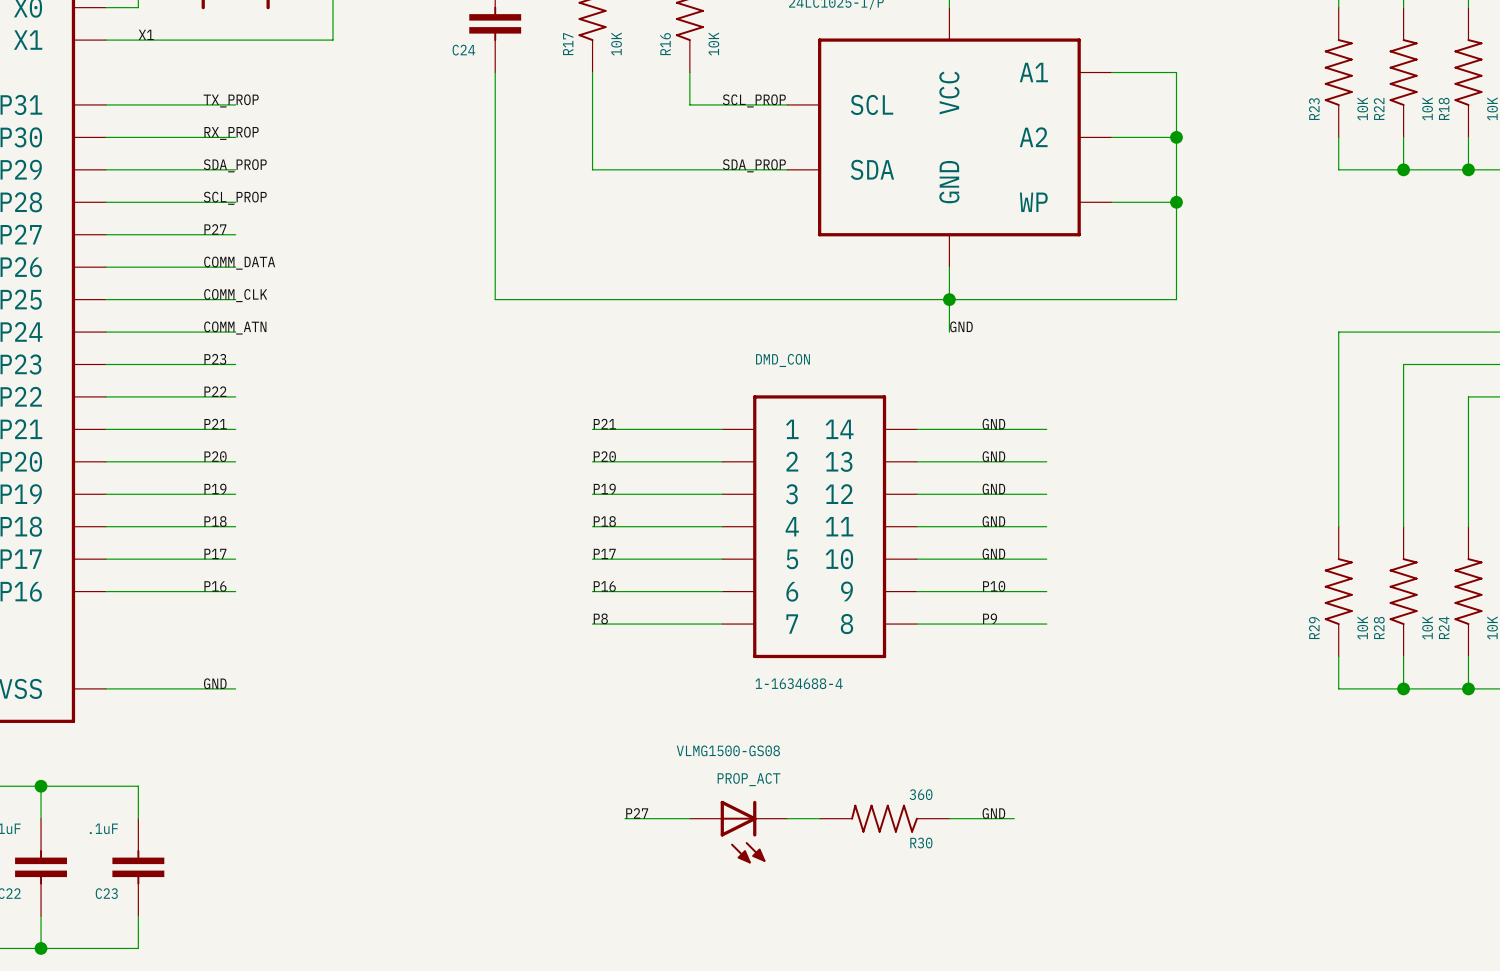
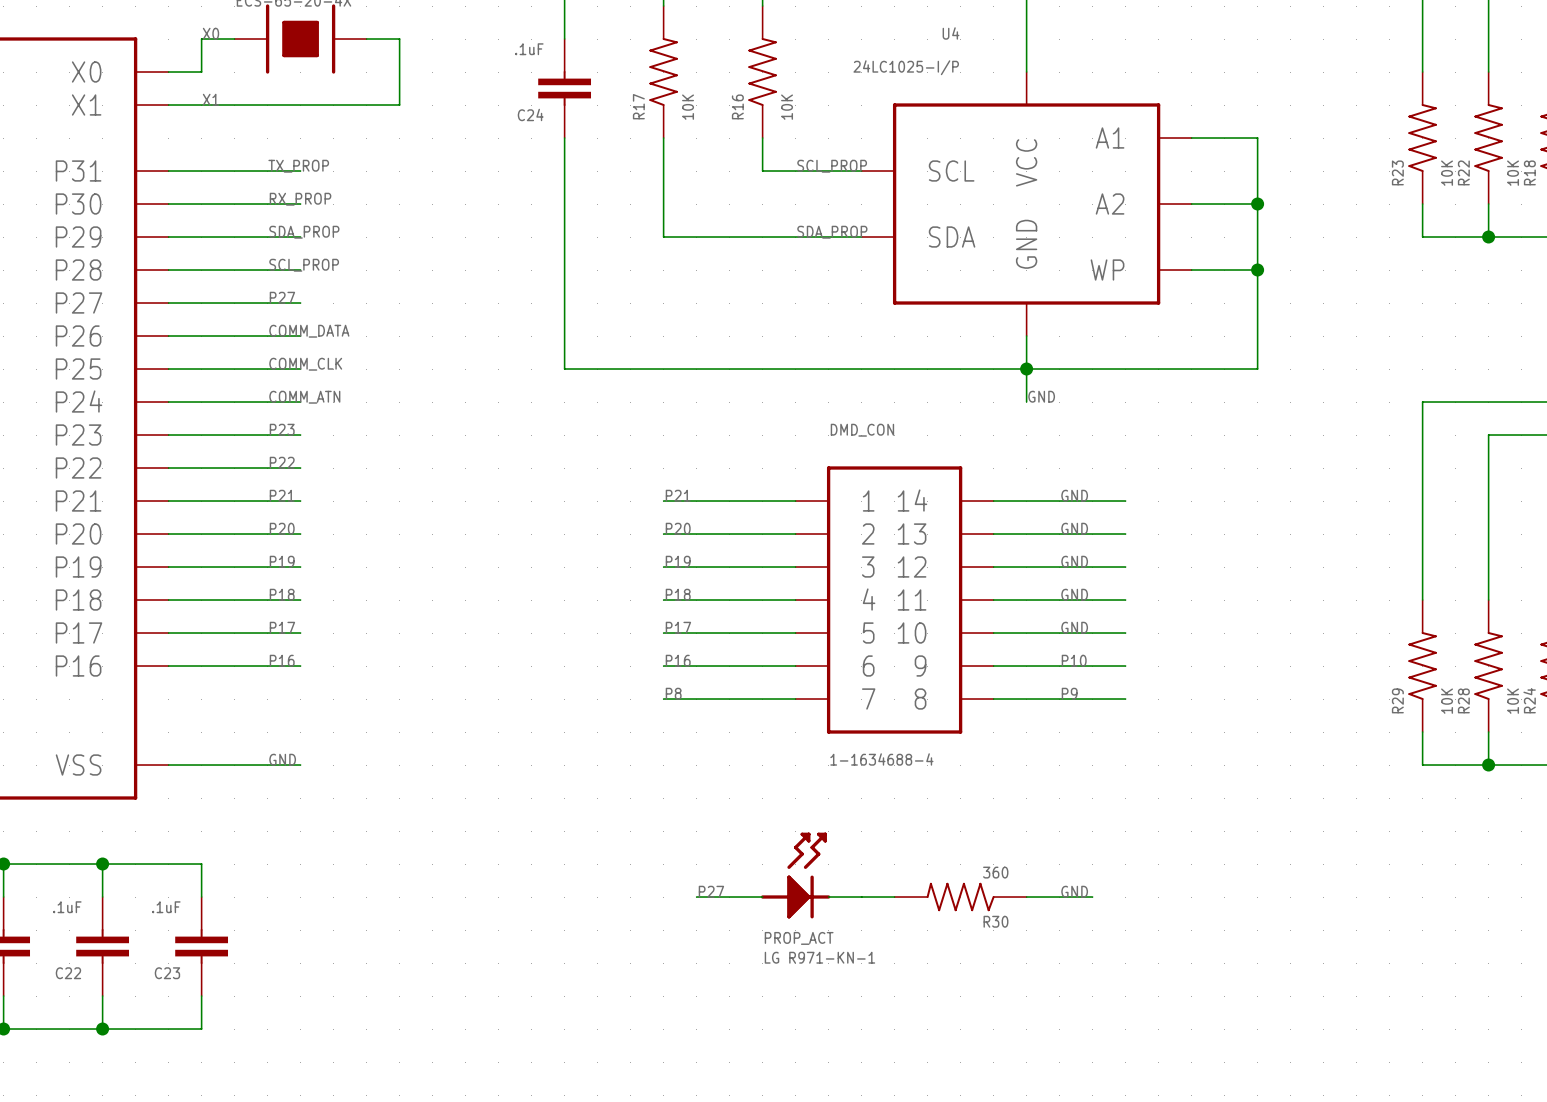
PROP_ACT: none -> LG R971-KN-1 (795, 875)
PROP_ACT: VLMG1500-GS08 (738, 832) -> none

